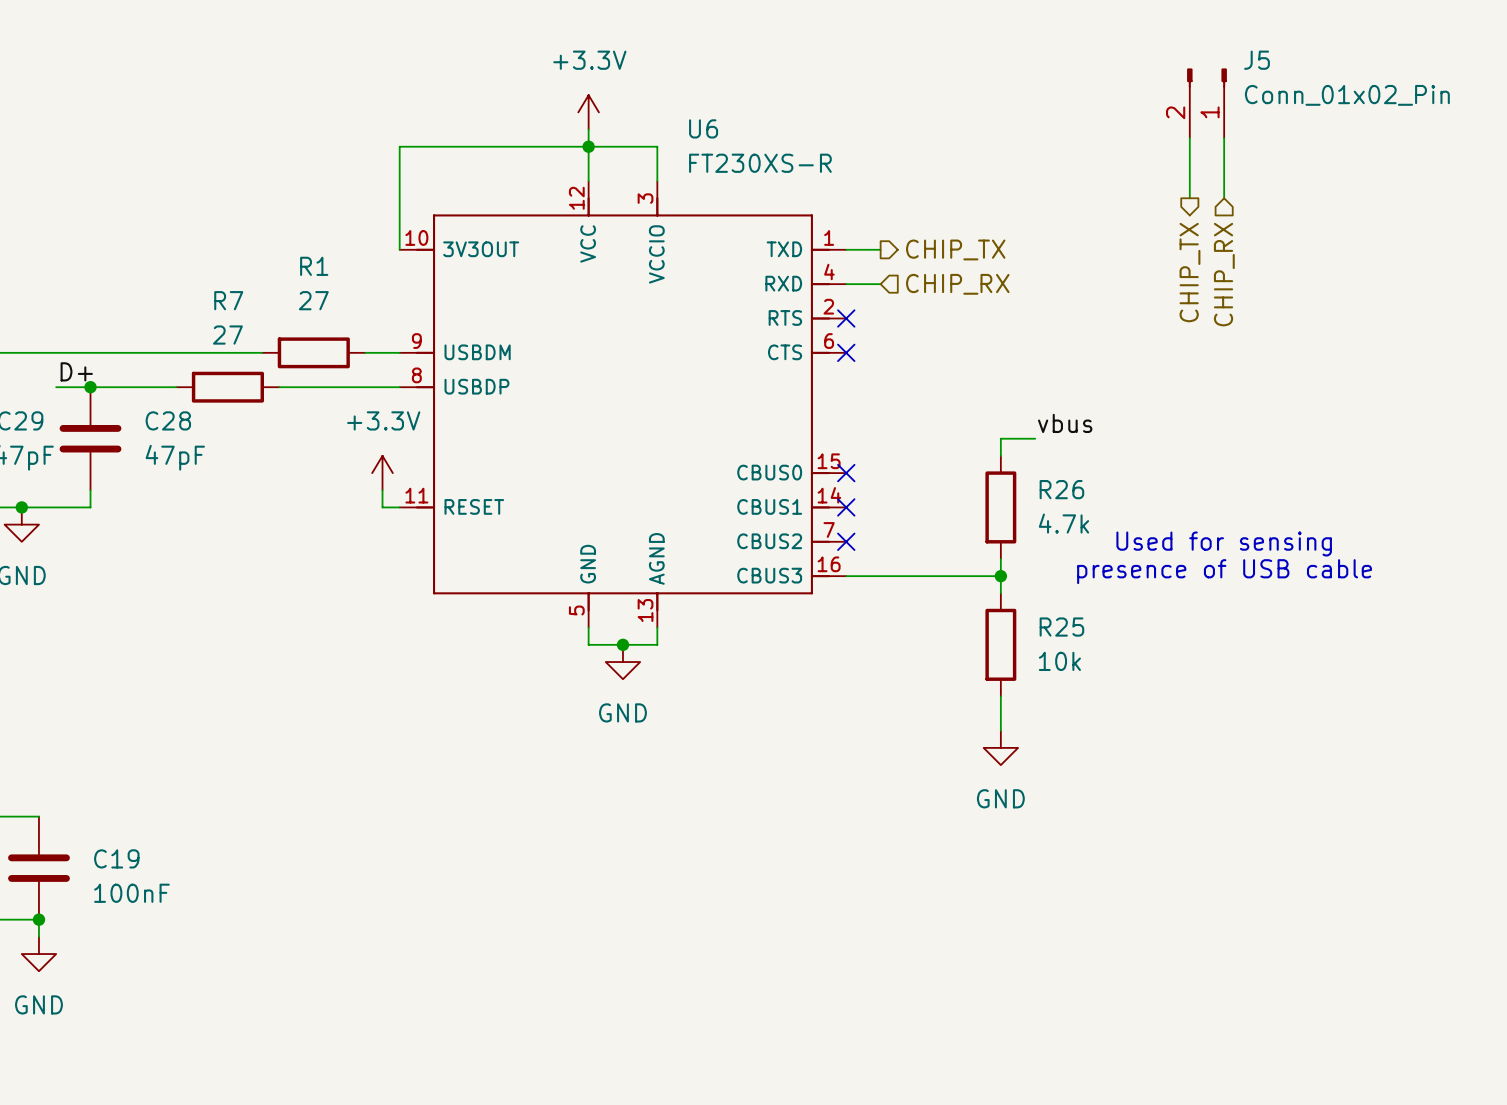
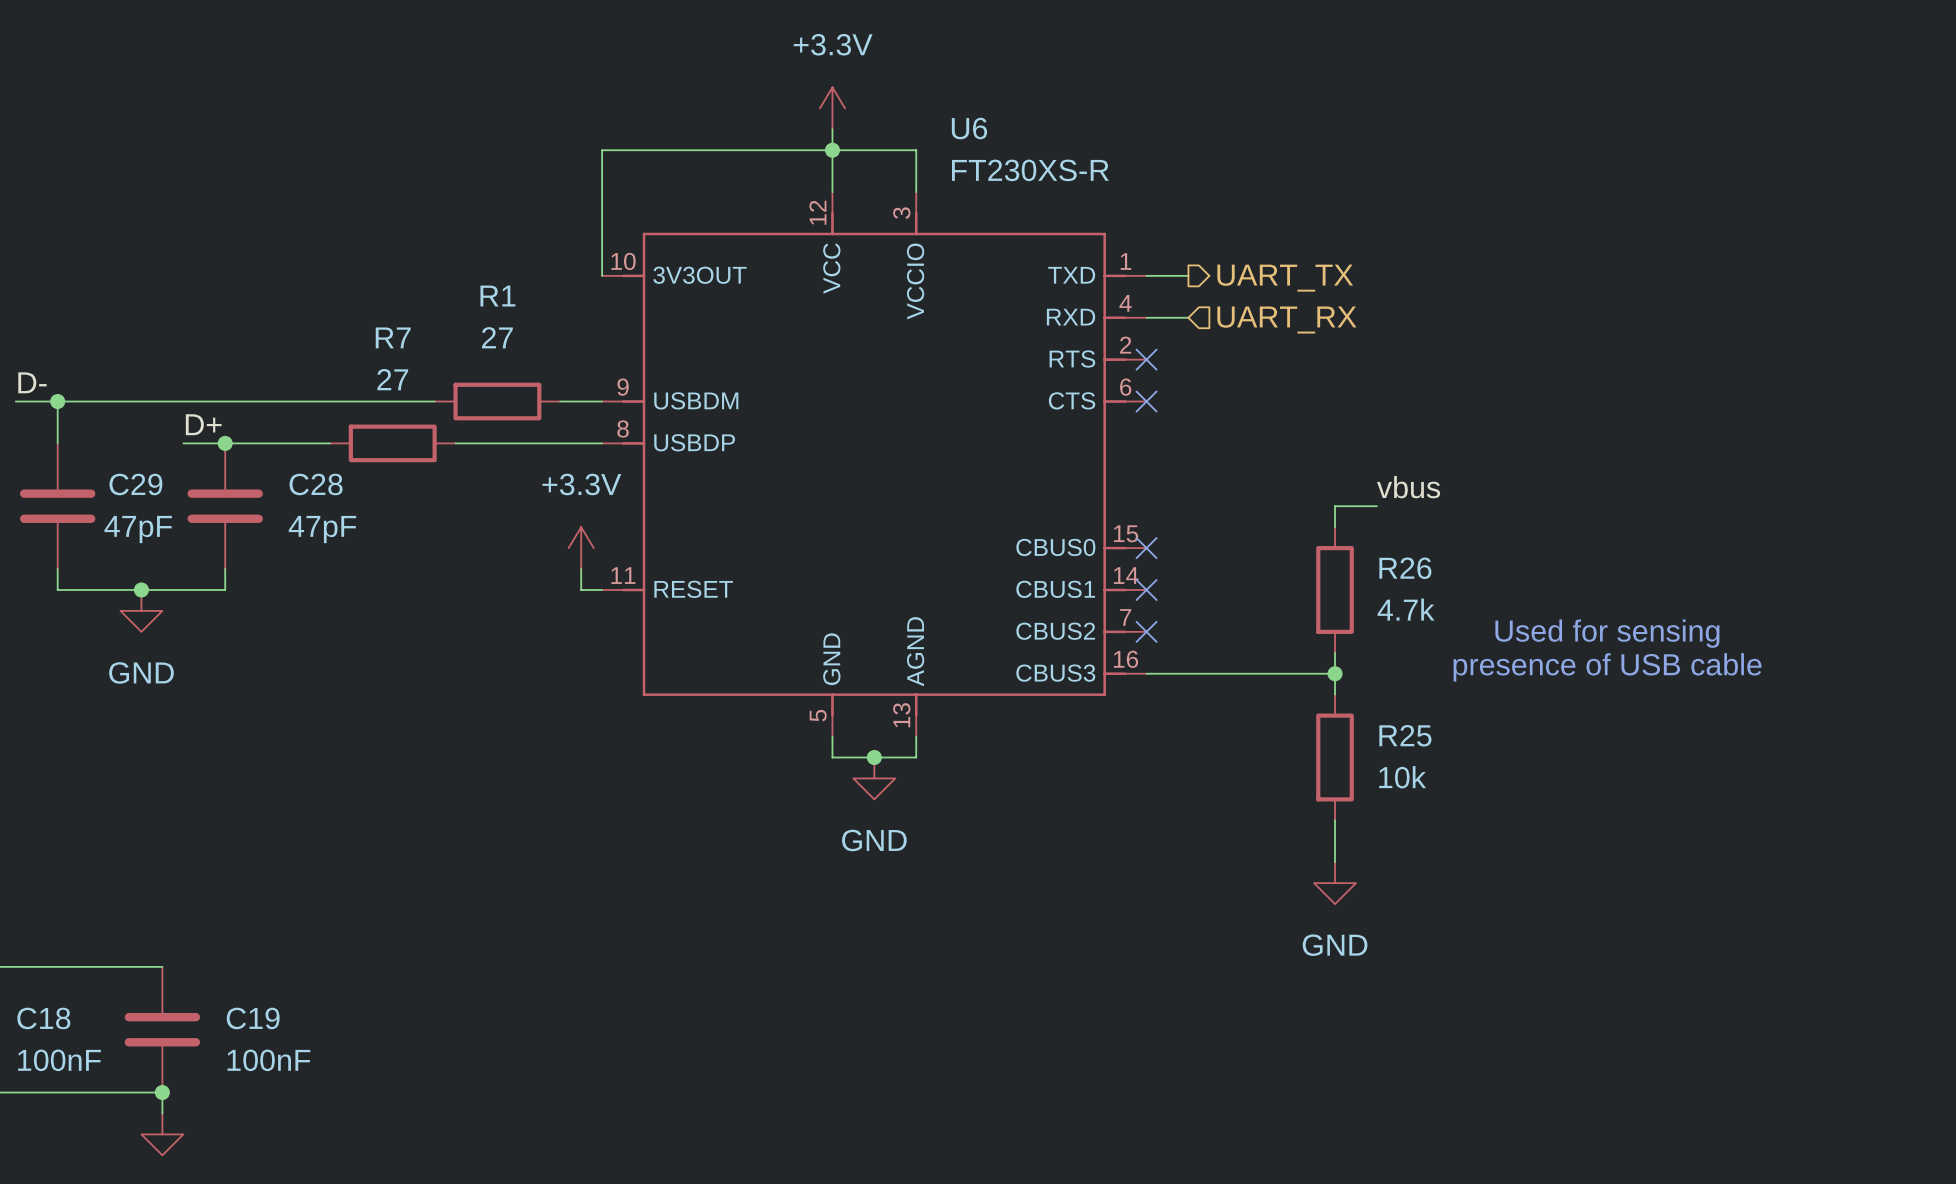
J5: Conn_01x02_Pin (1206, 103) -> none
wire: (1189, 138) (1189, 198) -> none
wire: (1224, 138) (1224, 198) -> none
hierarchical label: CHIP_TX (955, 249) -> UART_TX (1285, 278)
hierarchical label: CHIP_TX (1189, 272) -> none
hierarchical label: CHIP_RX (1224, 274) -> none
hierarchical label: CHIP_RX (957, 284) -> UART_RX (1286, 320)

